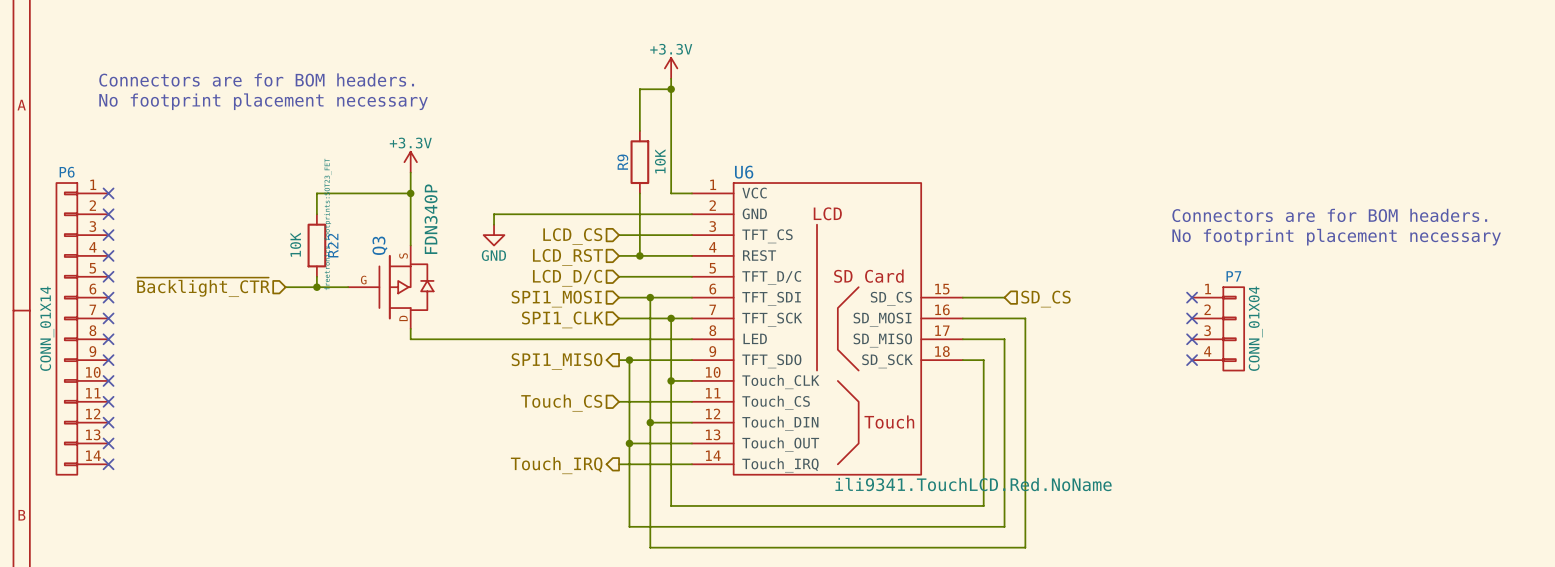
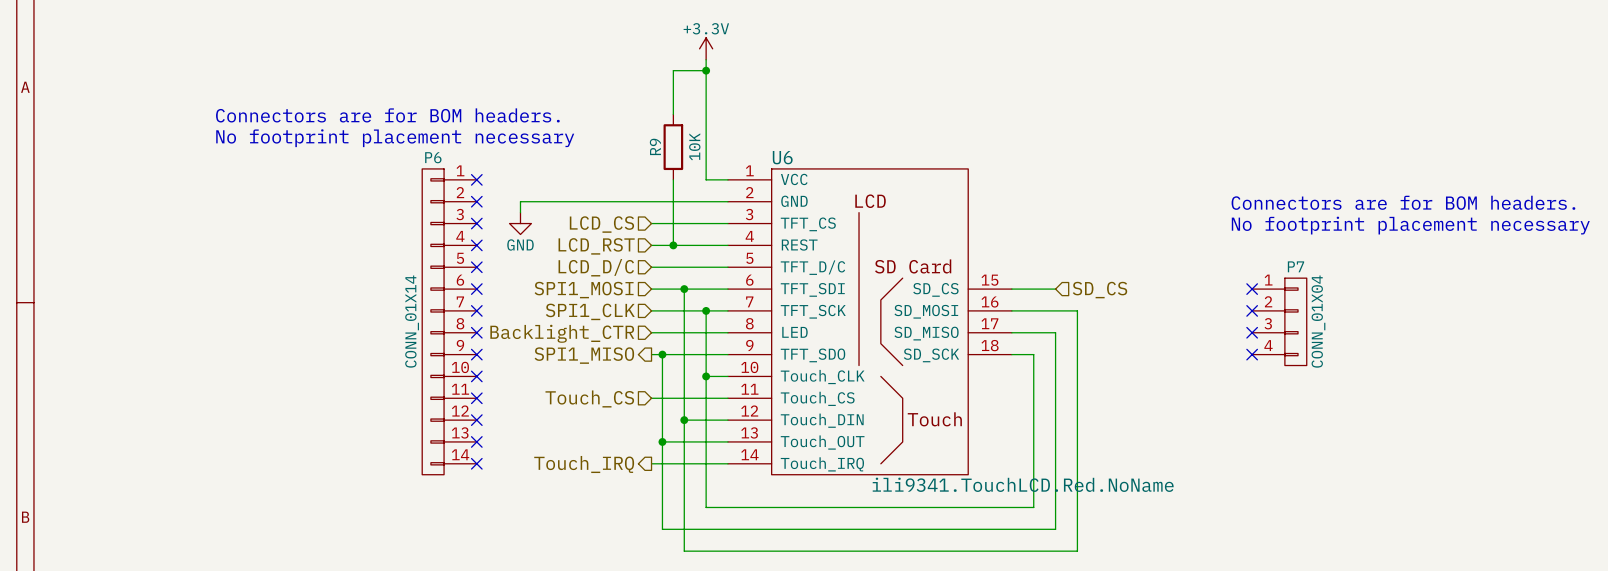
text position: Connectors are for BOM headers. (256, 79) -> Connectors are for BOM headers. (387, 115)
text position: No footprint placement necessary (263, 101) -> No footprint placement necessary (395, 138)
power symbol: +3.3V (410, 162) -> none
wire: (410, 172) (410, 245) -> none
no-connect mark: (108, 193) -> none
wire: (410, 193) (316, 193) (316, 214) -> none
junction: (410, 193) -> none
no-connect mark: none -> (476, 179)
no-connect mark: (108, 214) -> none
no-connect mark: none -> (476, 201)
no-connect mark: (108, 235) -> none
no-connect mark: none -> (476, 223)
R22: 10K (316, 245) -> none
no-connect mark: (108, 255) -> none
no-connect mark: none -> (476, 245)
no-connect mark: (108, 276) -> none
wire: (316, 276) (316, 287) -> none
no-connect mark: none -> (476, 267)
hierarchical label: ~{Backlight_CTR} (203, 287) -> none
wire: (285, 287) (348, 287) -> none
junction: (316, 287) -> none
Q3: FDN340P (391, 287) -> none
no-connect mark: (108, 297) -> none
no-connect mark: none -> (476, 289)
no-connect mark: (108, 318) -> none
no-connect mark: none -> (476, 310)
P6 position: (82, 328) -> (449, 321)
wire: (410, 328) (410, 339) (619, 339) -> none
no-connect mark: (108, 339) -> none
no-connect mark: none -> (476, 332)
hierarchical label: none -> Backlight_CTR (562, 333)
no-connect mark: (108, 360) -> none
no-connect mark: none -> (476, 354)
no-connect mark: (108, 380) -> none
no-connect mark: none -> (476, 376)
no-connect mark: (108, 401) -> none
no-connect mark: none -> (476, 398)
no-connect mark: (108, 422) -> none
no-connect mark: none -> (476, 420)
no-connect mark: (108, 443) -> none
no-connect mark: none -> (476, 441)
no-connect mark: (108, 464) -> none
no-connect mark: none -> (476, 463)

